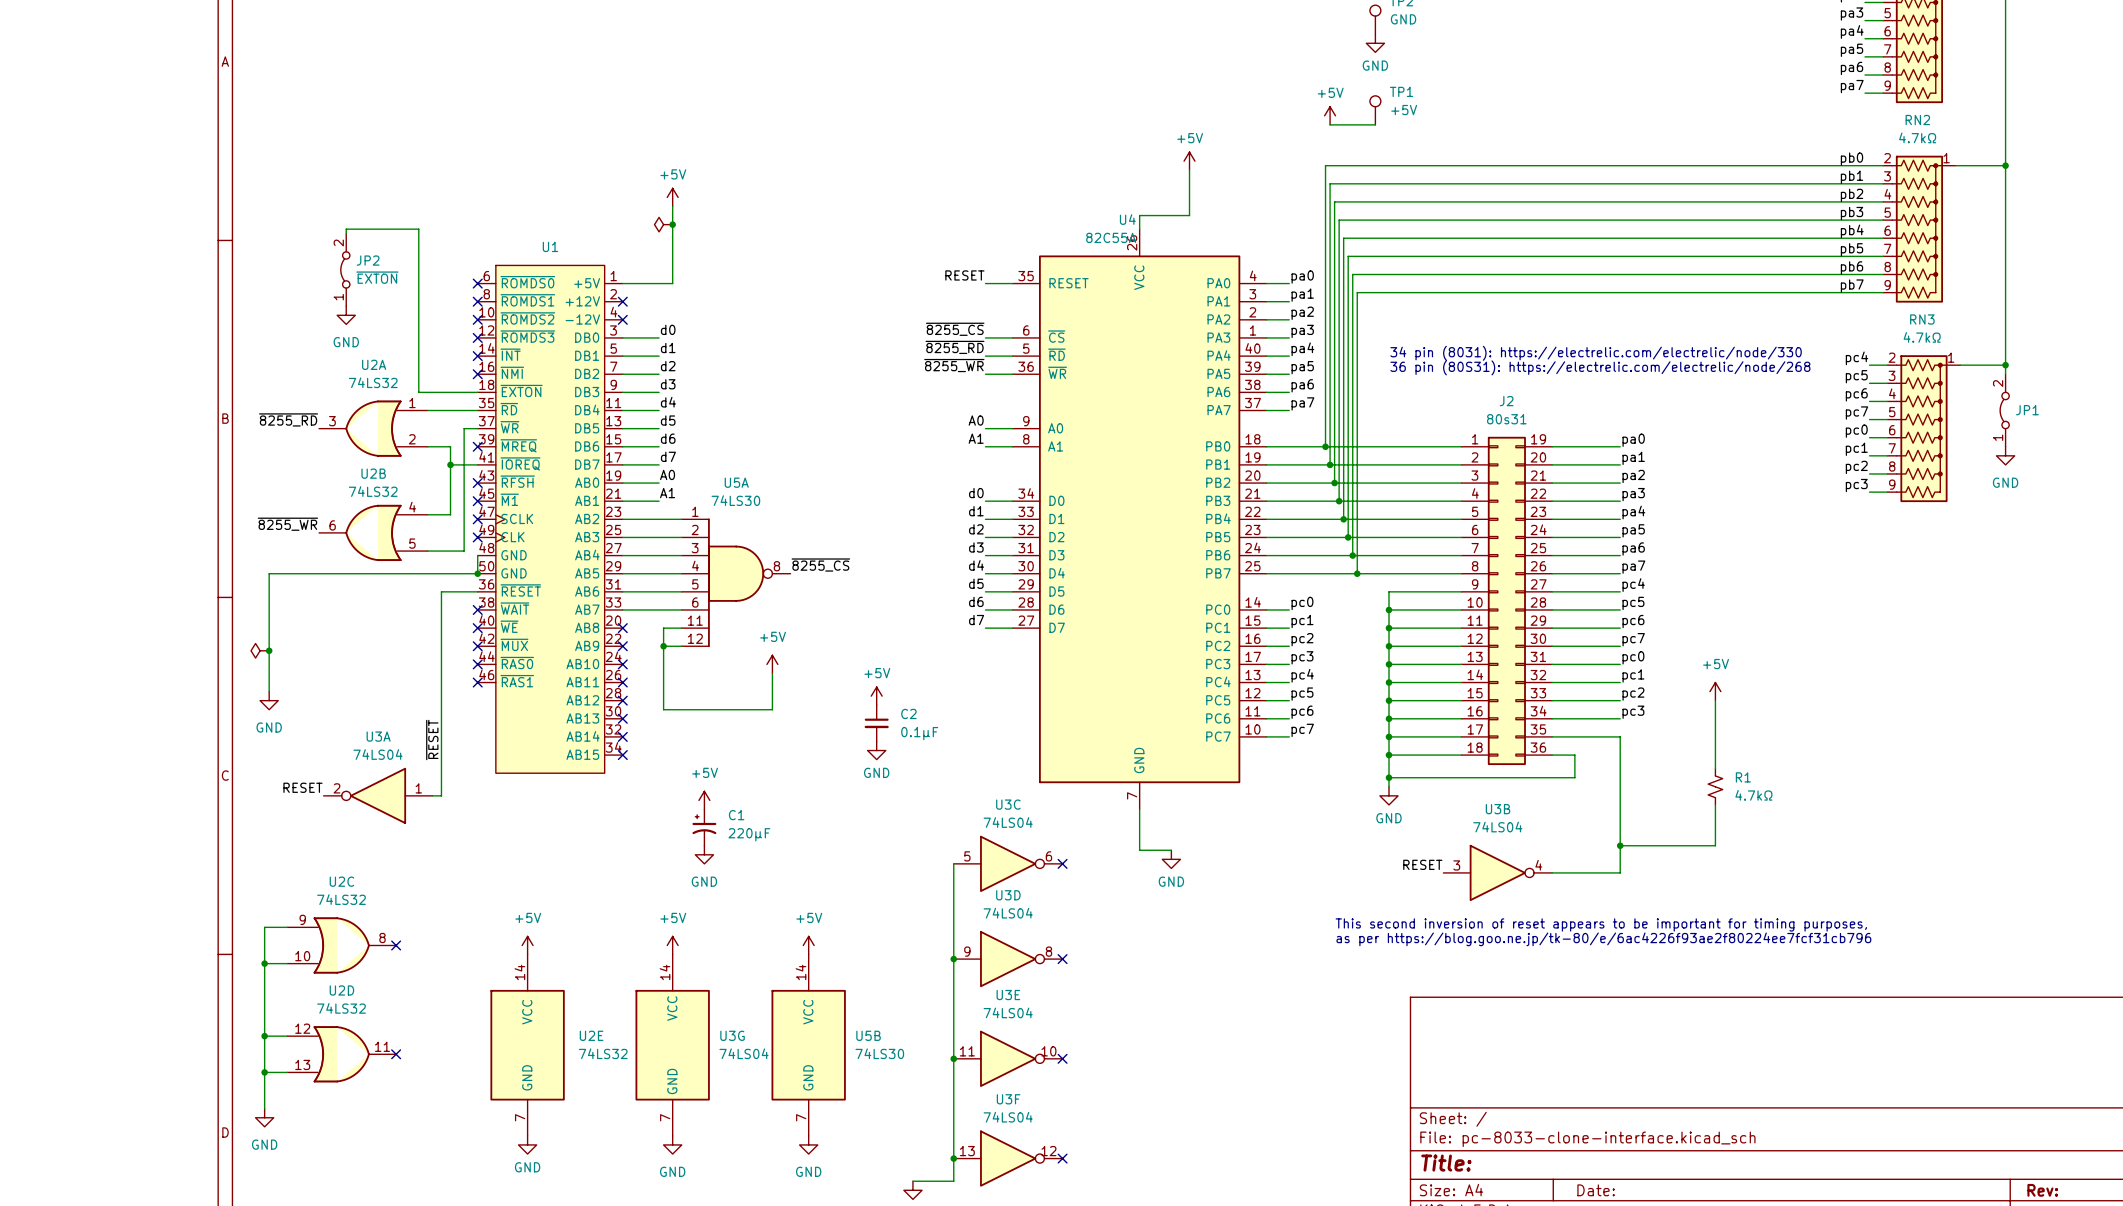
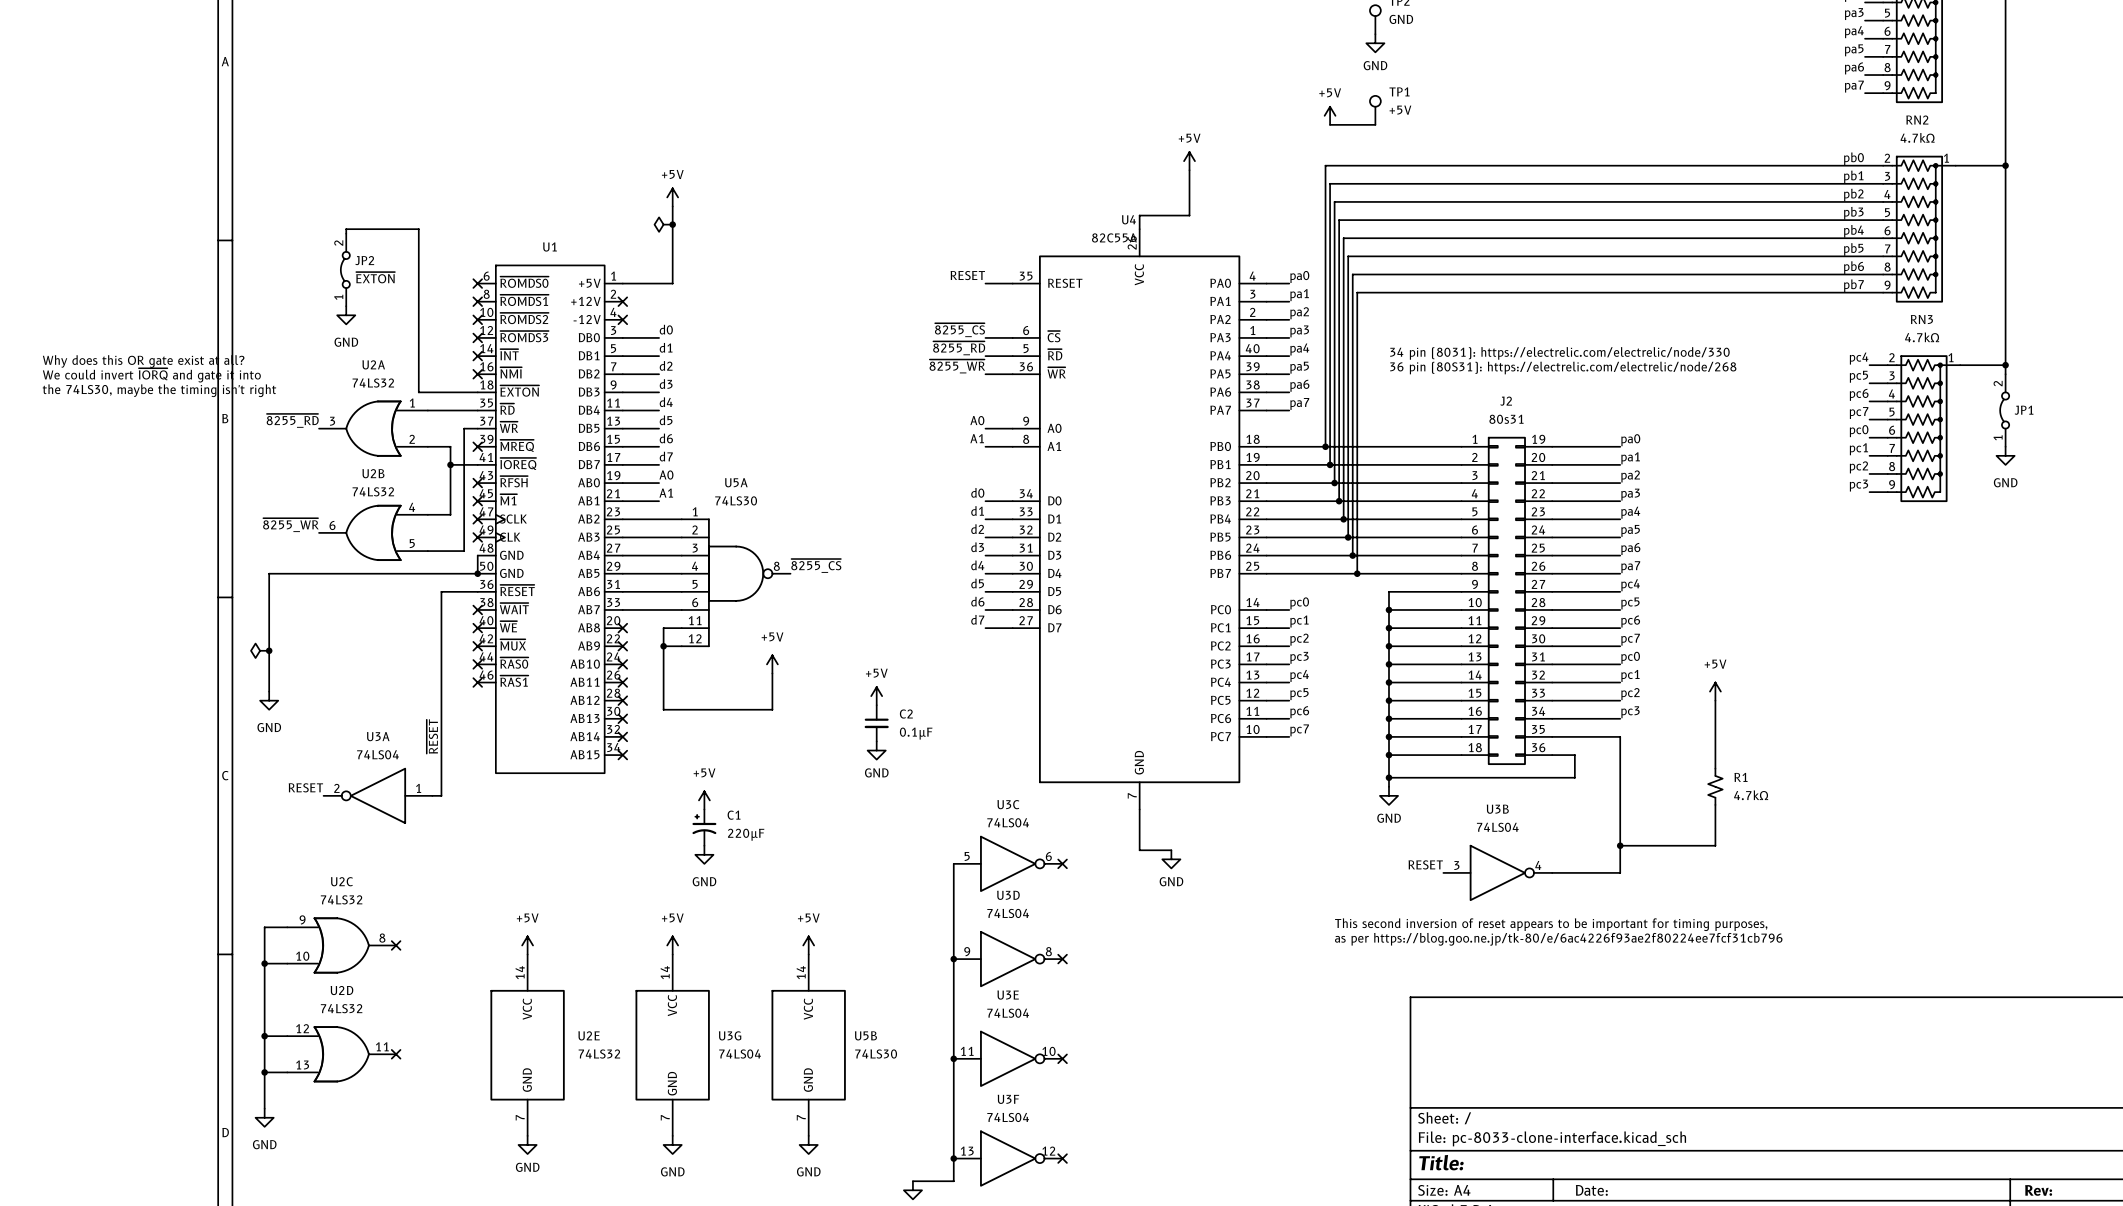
text: none -> Why does this OR gate exist at all? (143, 361)
text: none -> We could invert ~{IORQ} and gate it into (151, 375)
text: none -> the 74LS30, maybe the timing isn't right (159, 390)

